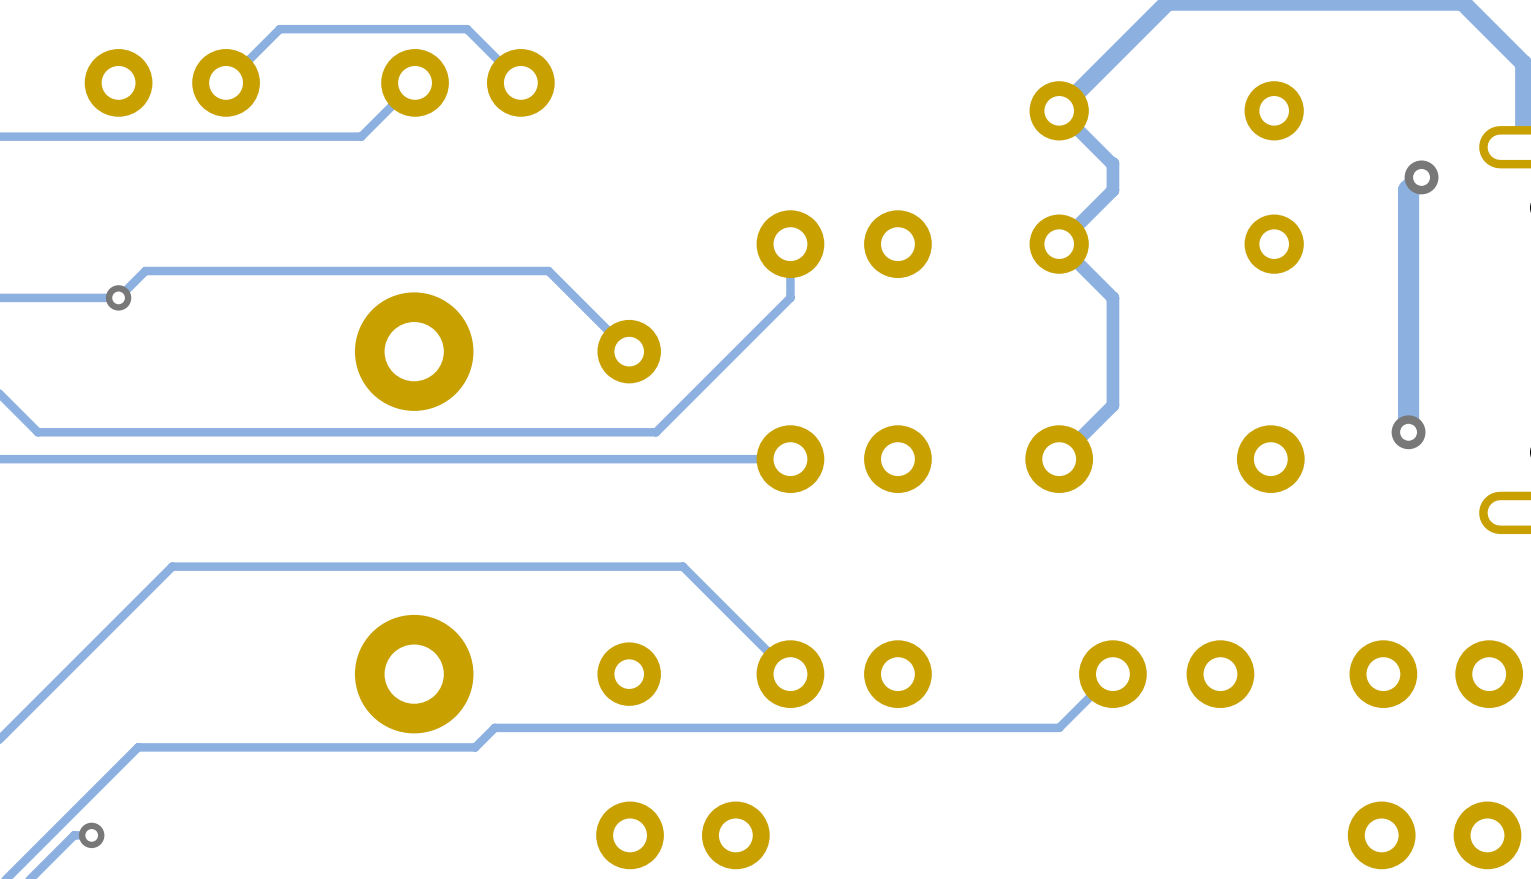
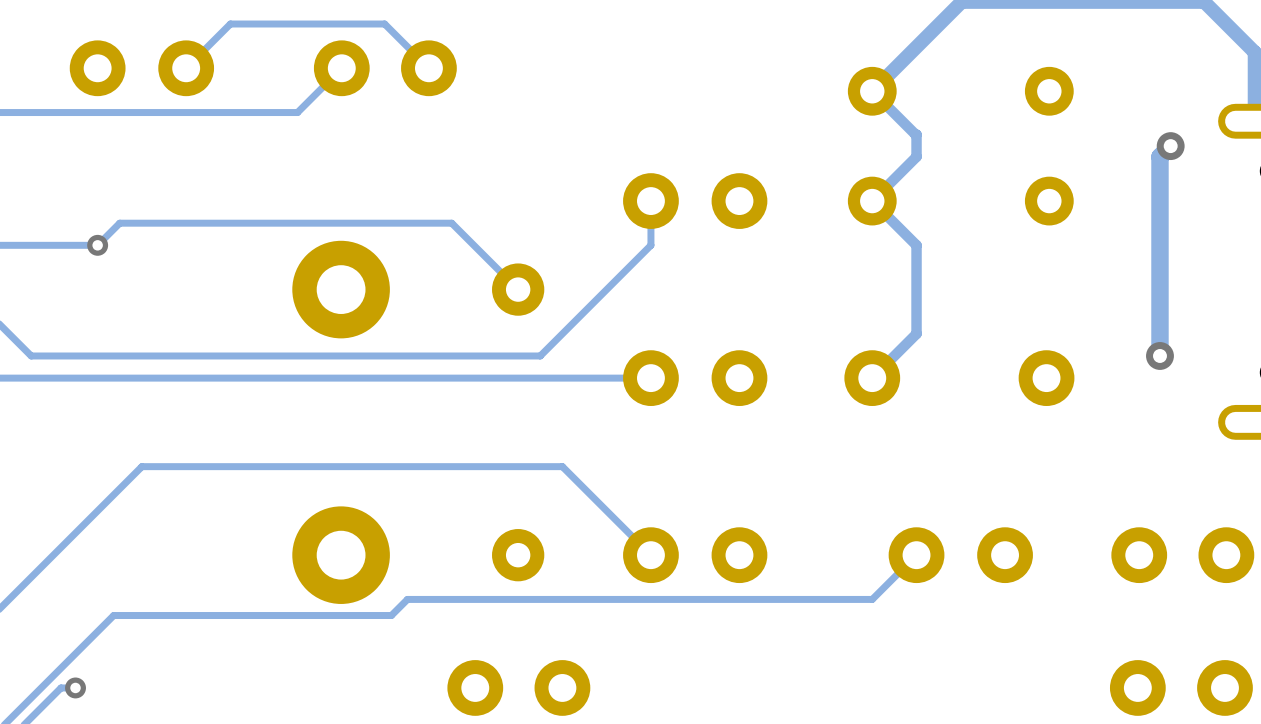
part position: (682, 835) -> (518, 687)

